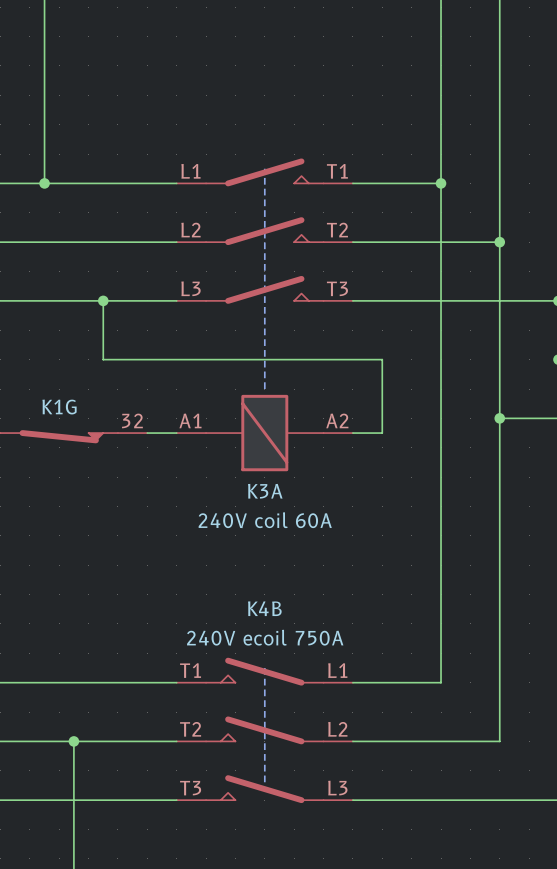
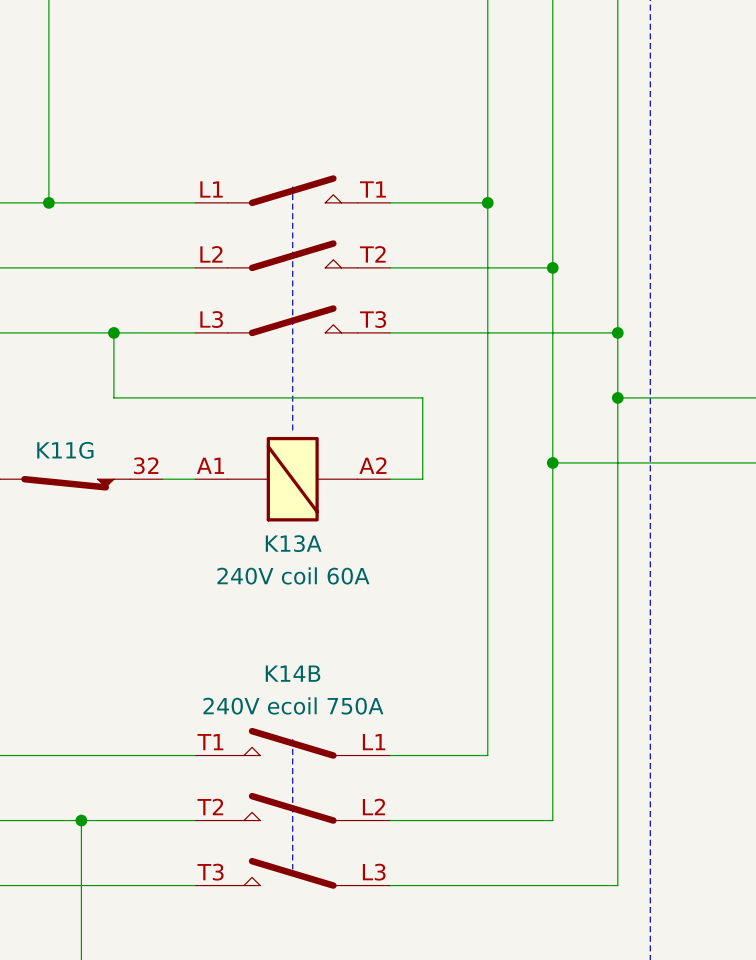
K1G name: K1G (59, 407) -> K11G (65, 450)
K3A name: K3A (265, 491) -> K13A (293, 543)
K4B name: K4B (264, 608) -> K14B (293, 673)

